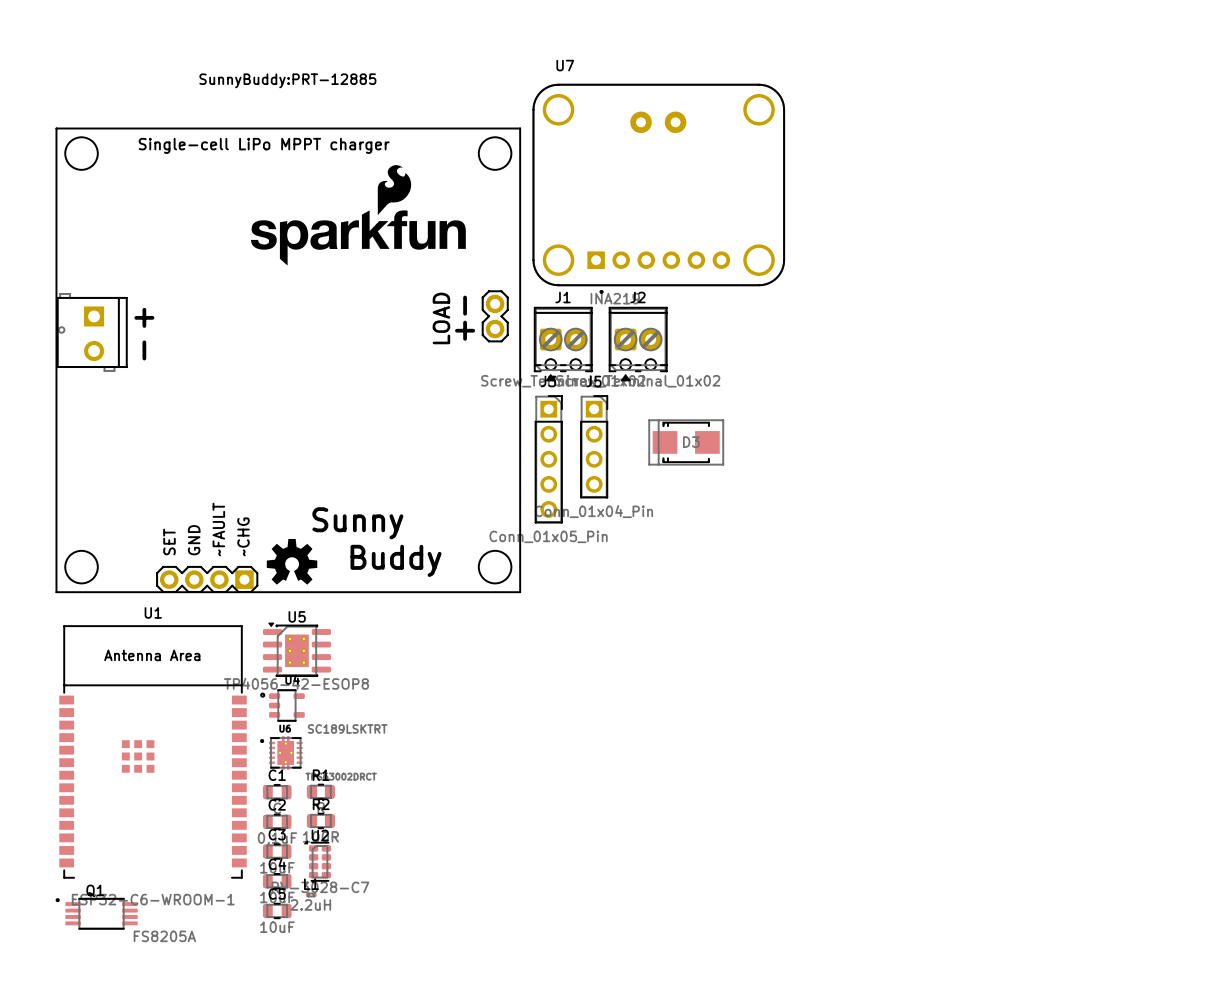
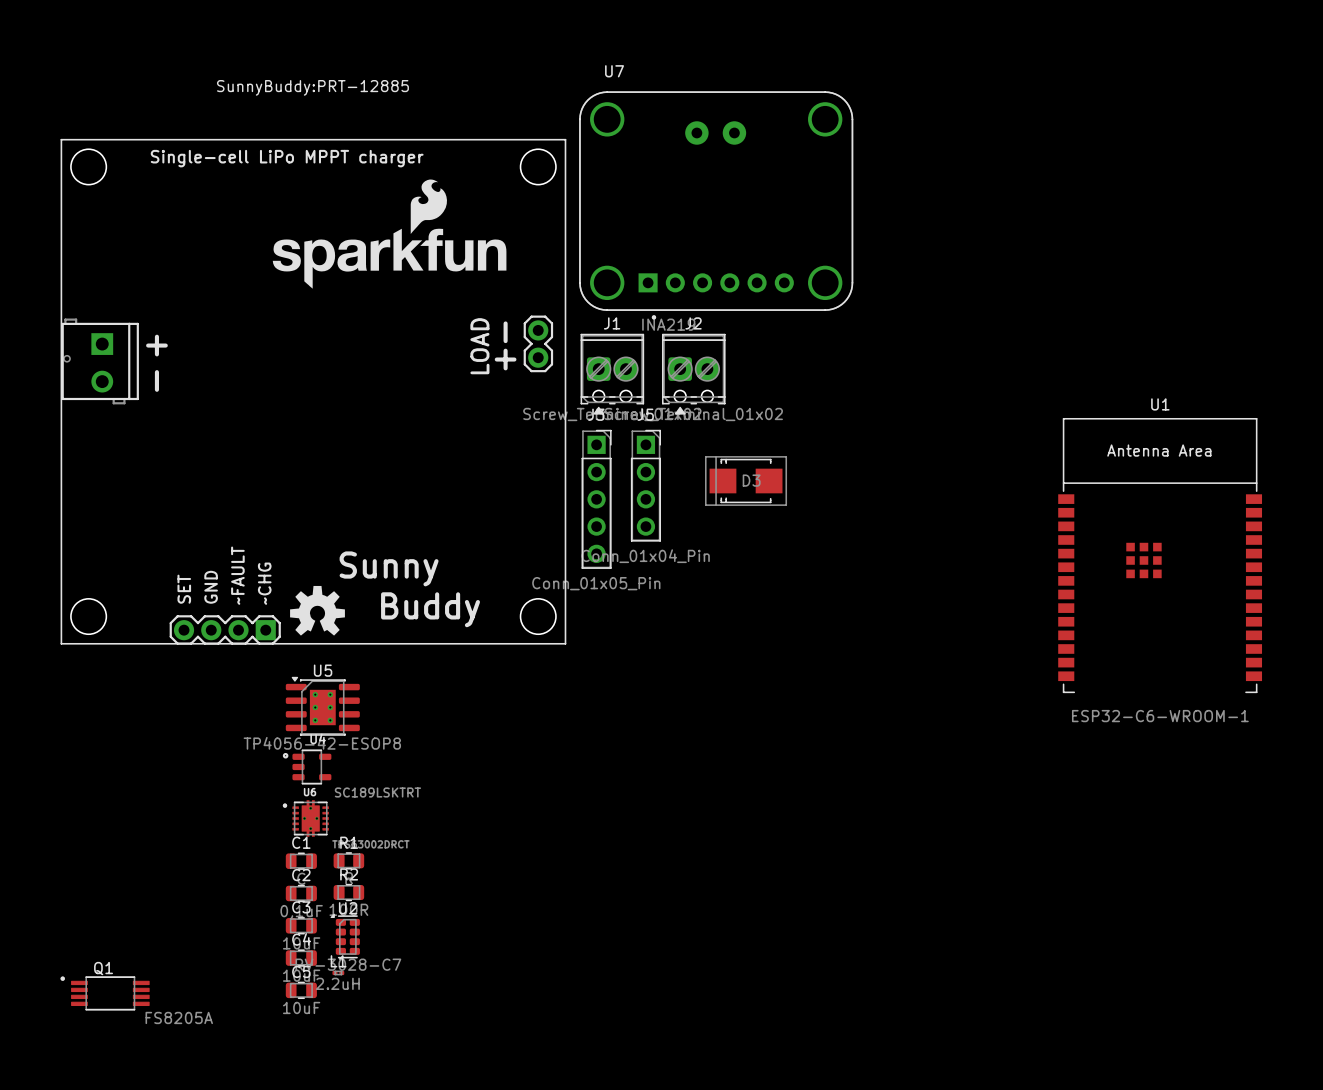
U1 position: (153, 751) -> (1160, 555)

